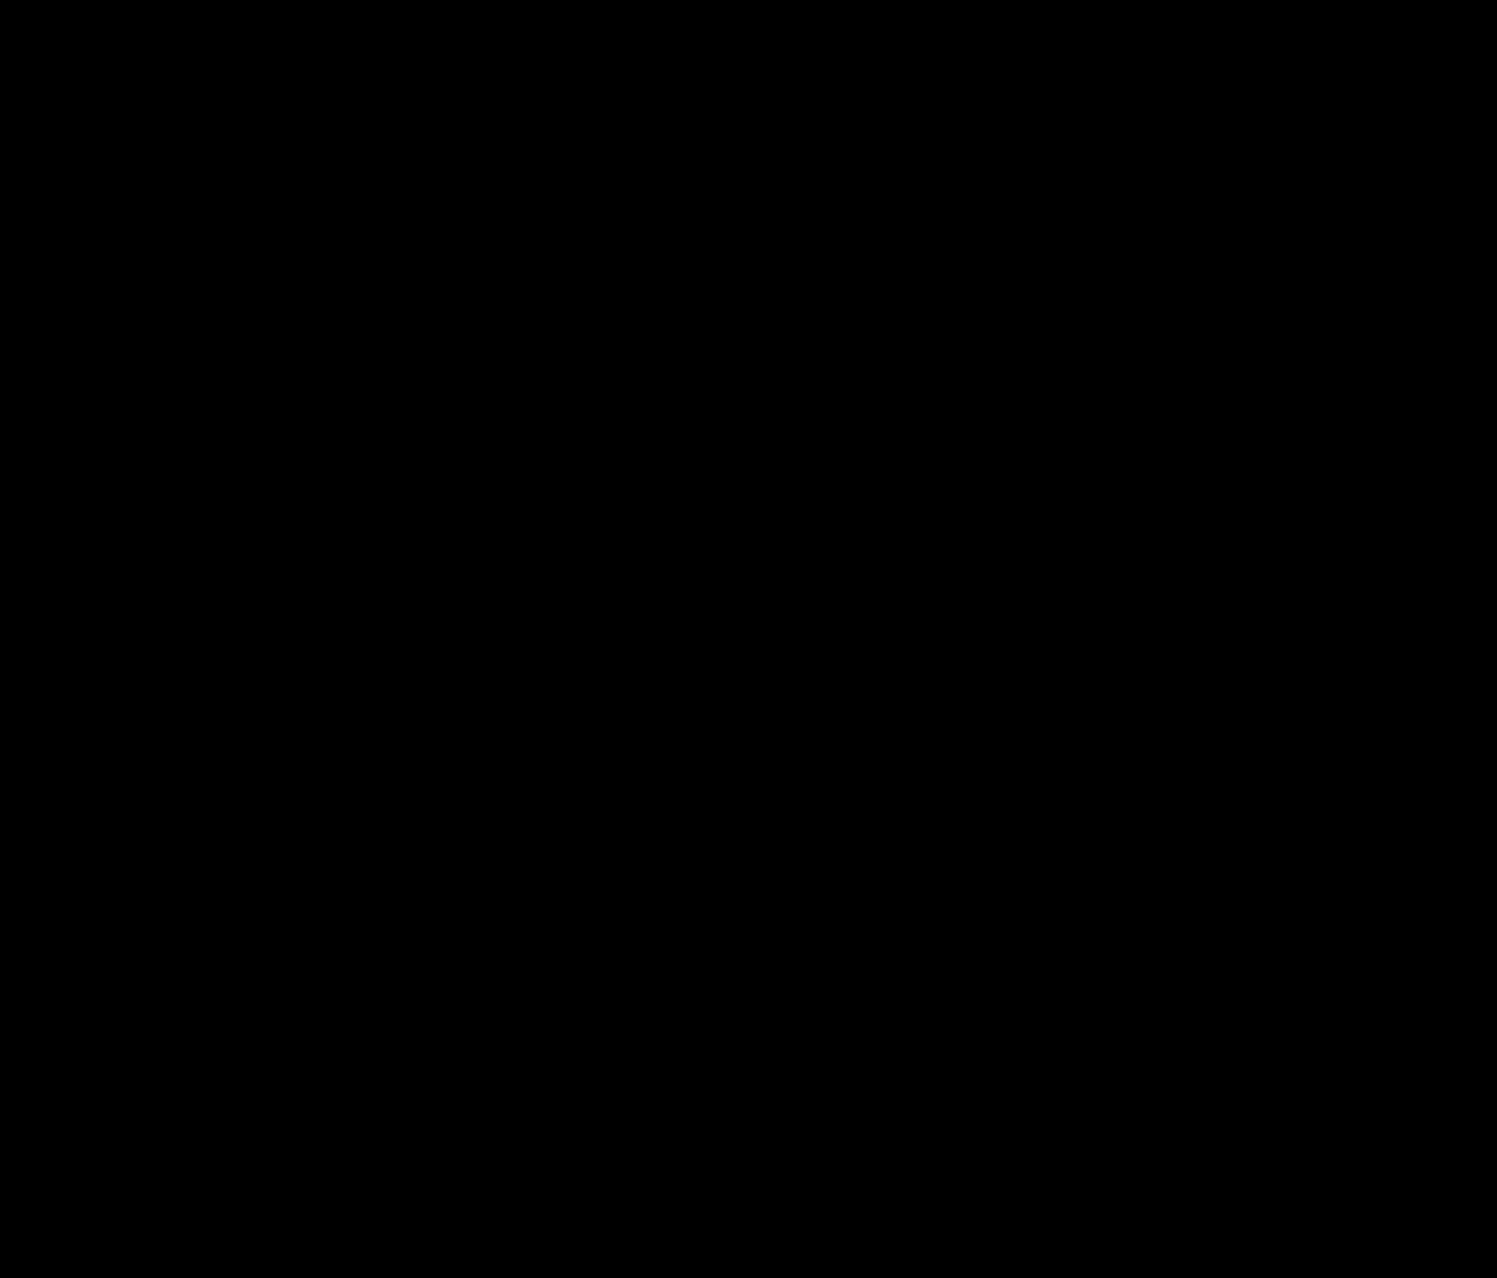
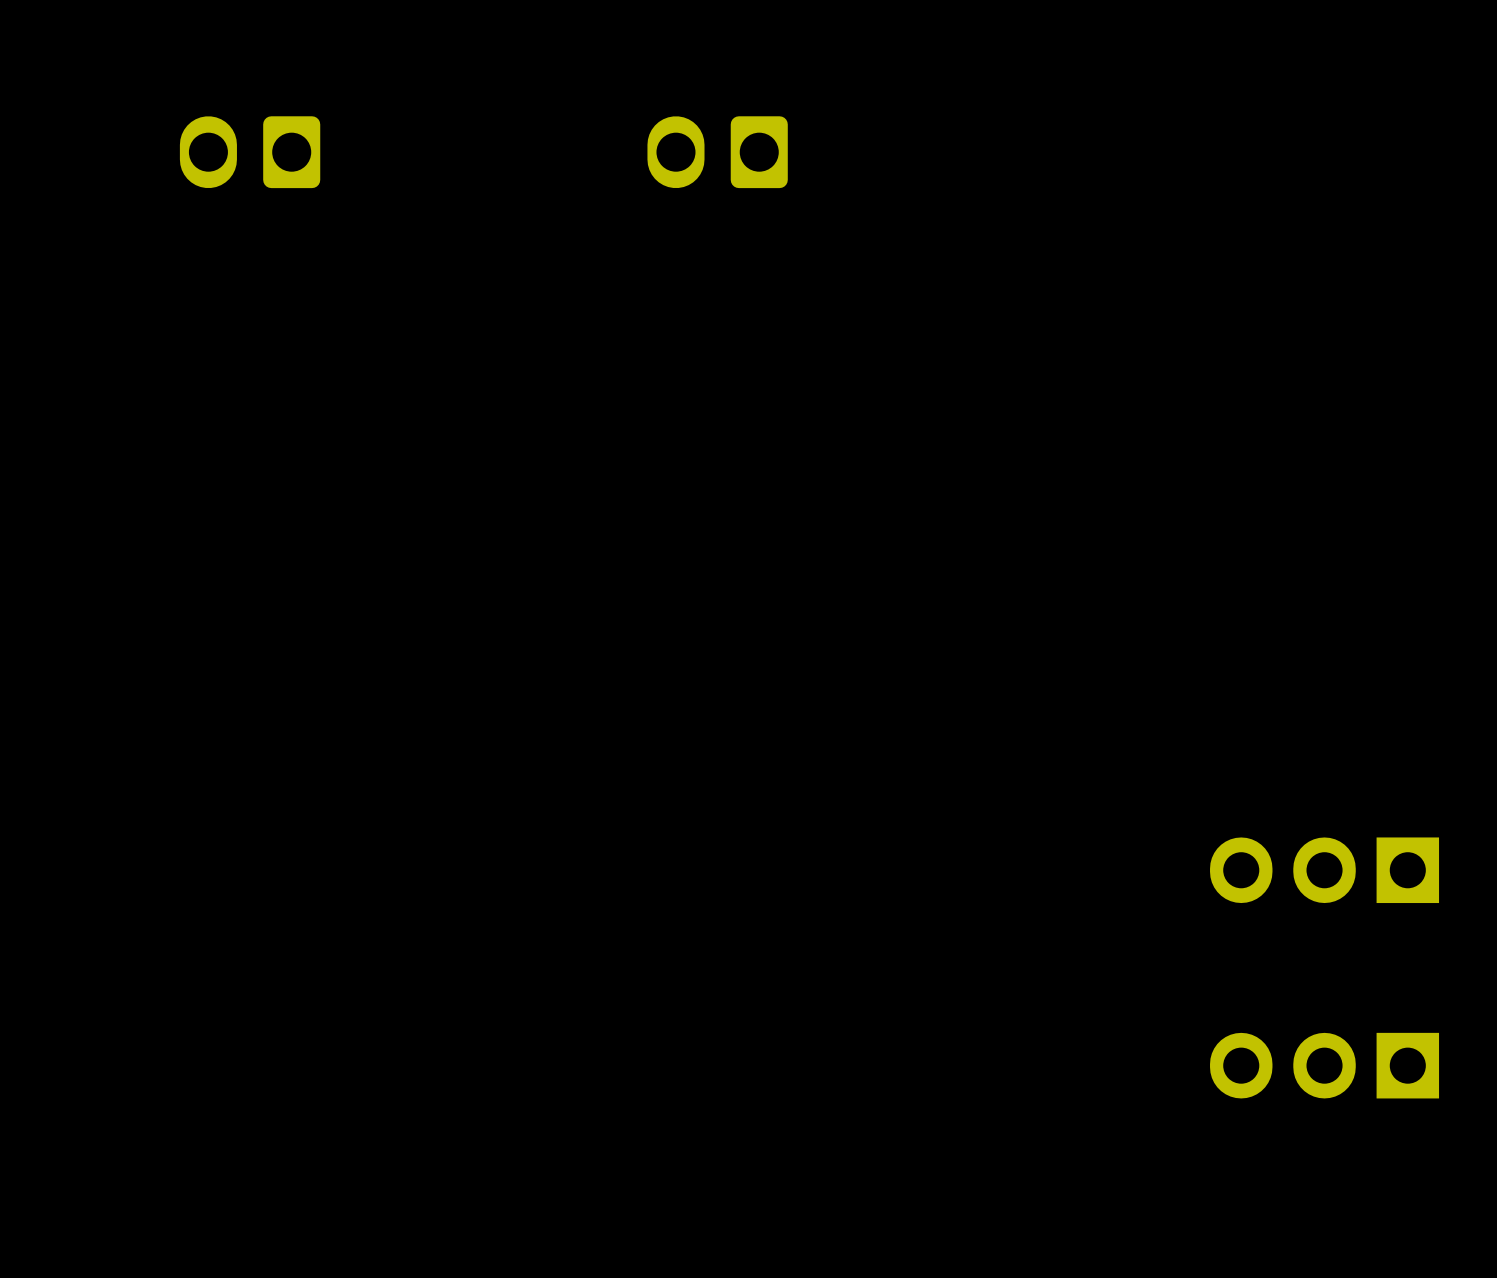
part: none -> (250, 152)
part: none -> (717, 152)
part: none -> (1324, 870)
part: none -> (1324, 1065)

